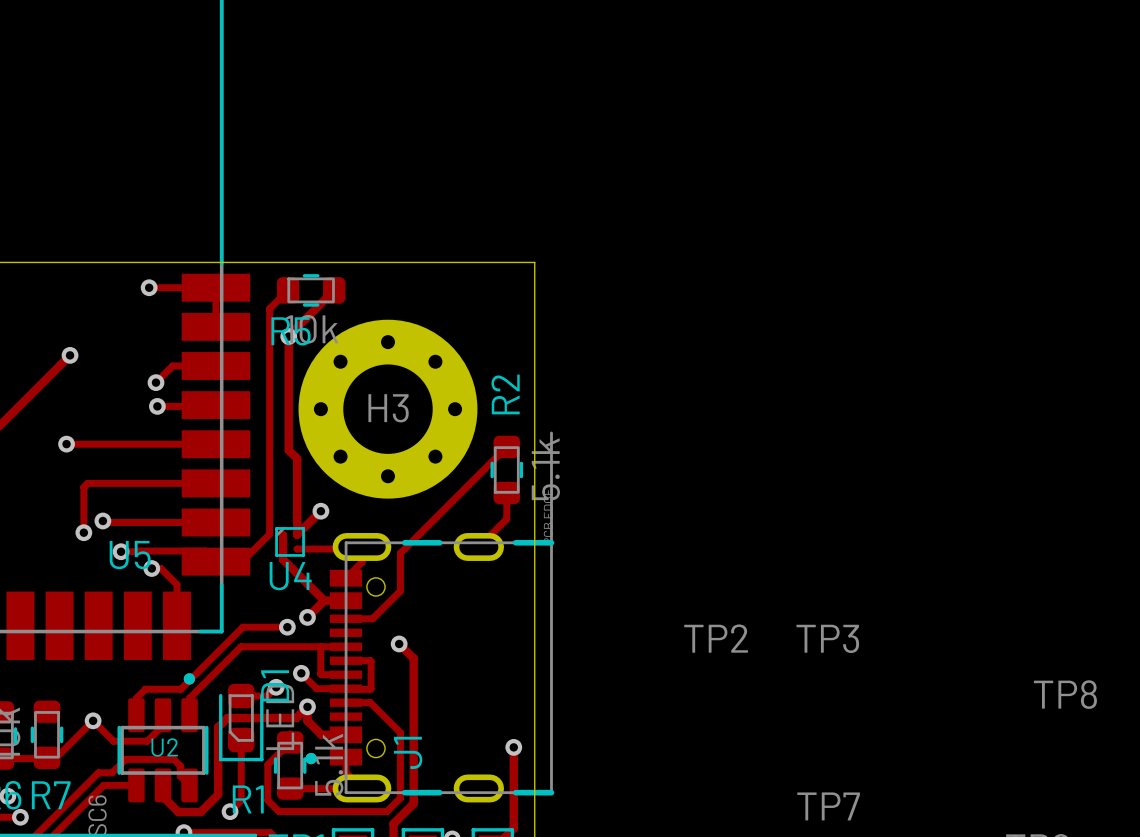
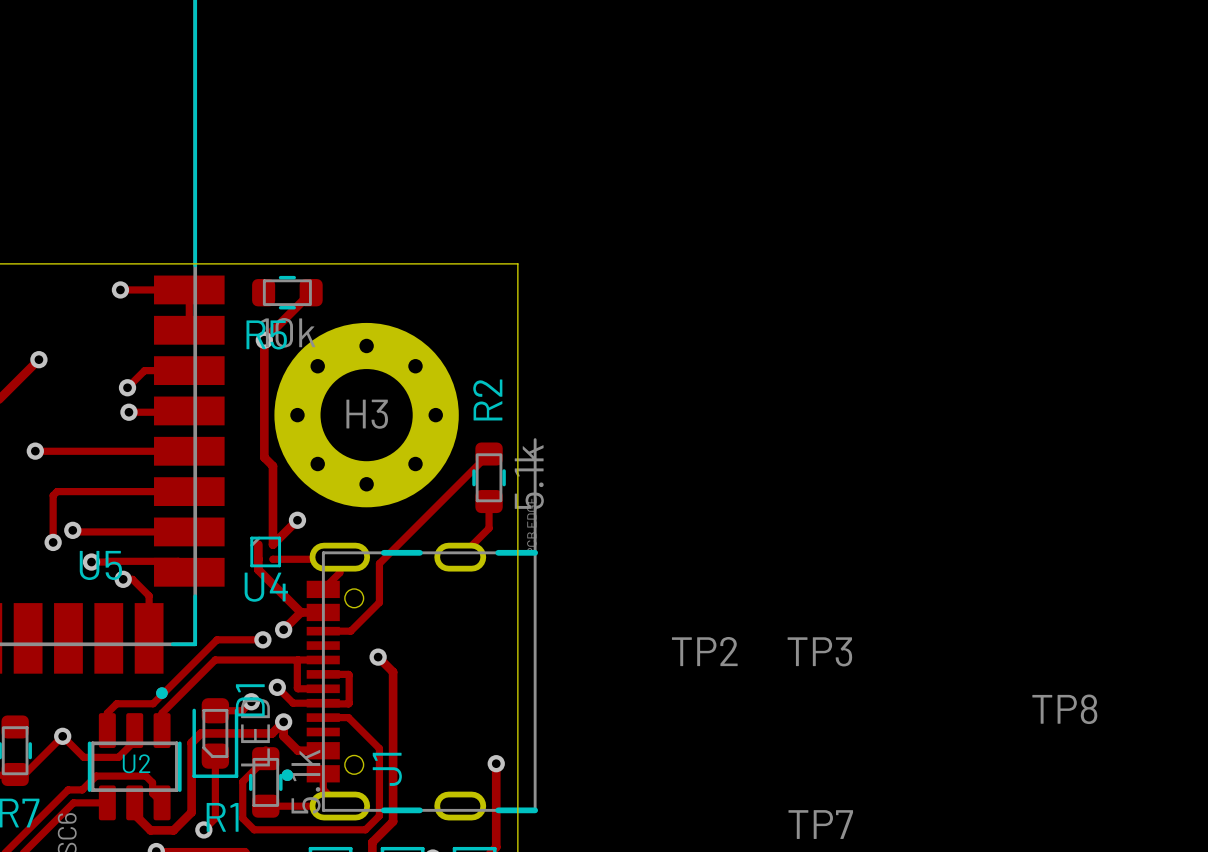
track: (288, 290) (269, 308) (269, 534) (242, 561) (215, 561) -> none

